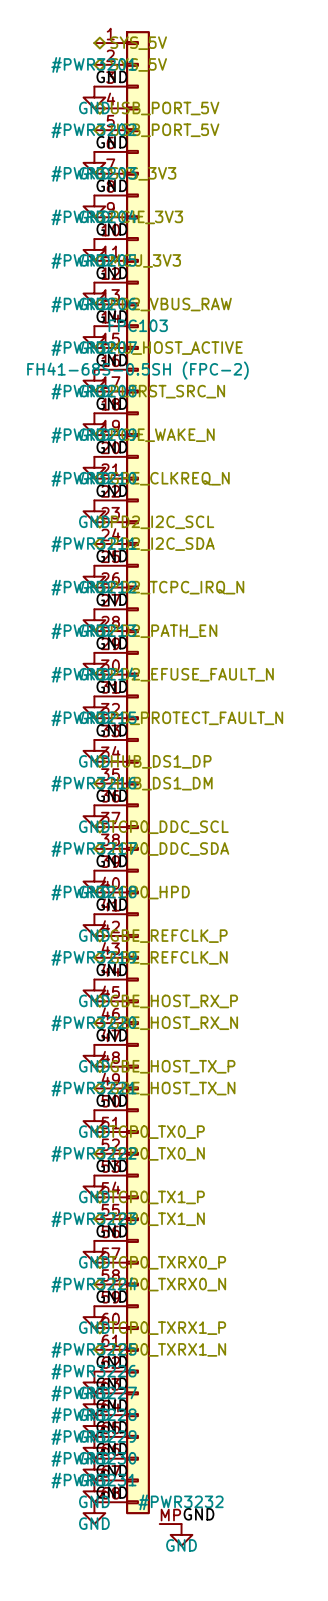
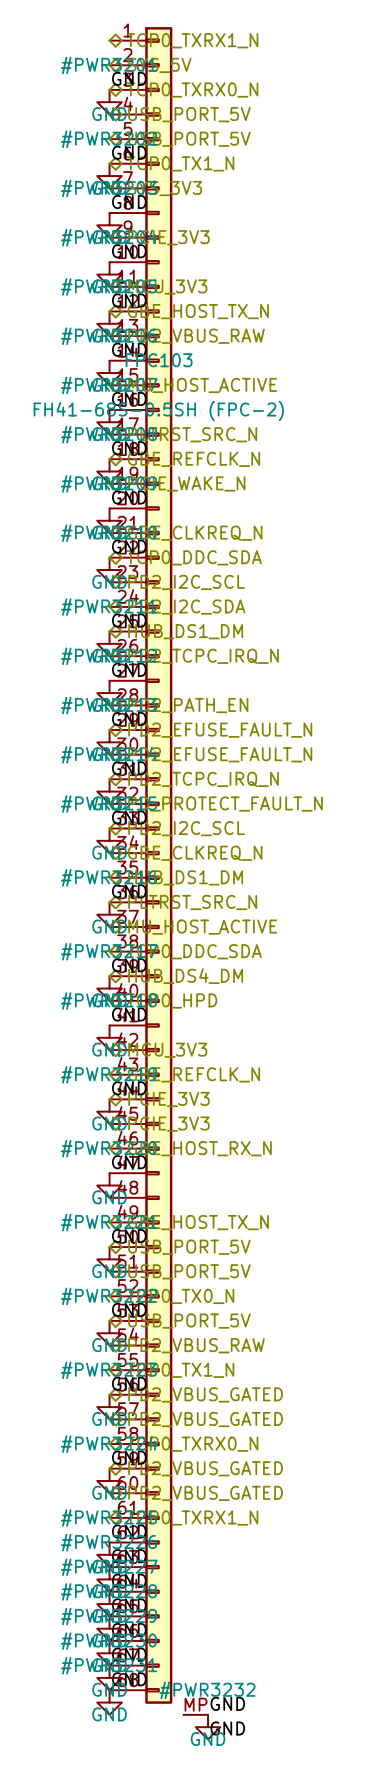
hierarchical label: SYS_5V (138, 43) -> TCP0_TXRX1_N (192, 40)
hierarchical label: none -> TCP0_TXRX0_N (192, 90)
hierarchical label: none -> TCP0_TX1_N (180, 163)
hierarchical label: none -> GBE_HOST_TX_N (198, 311)
hierarchical label: none -> GBE_REFCLK_N (193, 459)
hierarchical label: none -> TCP0_DDC_SDA (194, 557)
hierarchical label: none -> HUB_DS1_DM (185, 631)
hierarchical label: none -> PD2_EFUSE_FAULT_N (220, 730)
hierarchical label: none -> PD2_TCPC_IRQ_N (203, 779)
hierarchical label: none -> PD2_I2C_SCL (186, 828)
hierarchical label: HUB_DS1_DP (161, 761) -> GBE_CLKREQ_N (195, 853)
hierarchical label: none -> PLTRST_SRC_N (192, 902)
hierarchical label: TCP0_DDC_SCL (168, 827) -> MU_HOST_ACTIVE (202, 927)
hierarchical label: none -> HUB_DS4_DM (185, 976)
hierarchical label: GBE_REFCLK_P (168, 936) -> MCU_3V3 (167, 1050)
hierarchical label: none -> PCIE_3V3 (168, 1099)
hierarchical label: GBE_HOST_RX_P (174, 1001) -> PCIE_3V3 (168, 1124)
hierarchical label: GBE_HOST_TX_P (172, 1066) -> none
hierarchical label: none -> USB_PORT_5V (189, 1247)
hierarchical label: TCP0_TX0_P (157, 1132) -> USB_PORT_5V (189, 1271)
hierarchical label: none -> USB_PORT_5V (189, 1321)
hierarchical label: TCP0_TX1_P (157, 1197) -> PD2_VBUS_RAW (196, 1345)
hierarchical label: none -> PD2_VBUS_GATED (205, 1394)
hierarchical label: TCP0_TXRX0_P (167, 1262) -> PD2_VBUS_GATED (205, 1419)
hierarchical label: none -> PD2_VBUS_GATED (205, 1468)
hierarchical label: TCP0_TXRX1_P (167, 1328) -> PD2_VBUS_GATED (205, 1493)
label: none -> GND (227, 1728)

